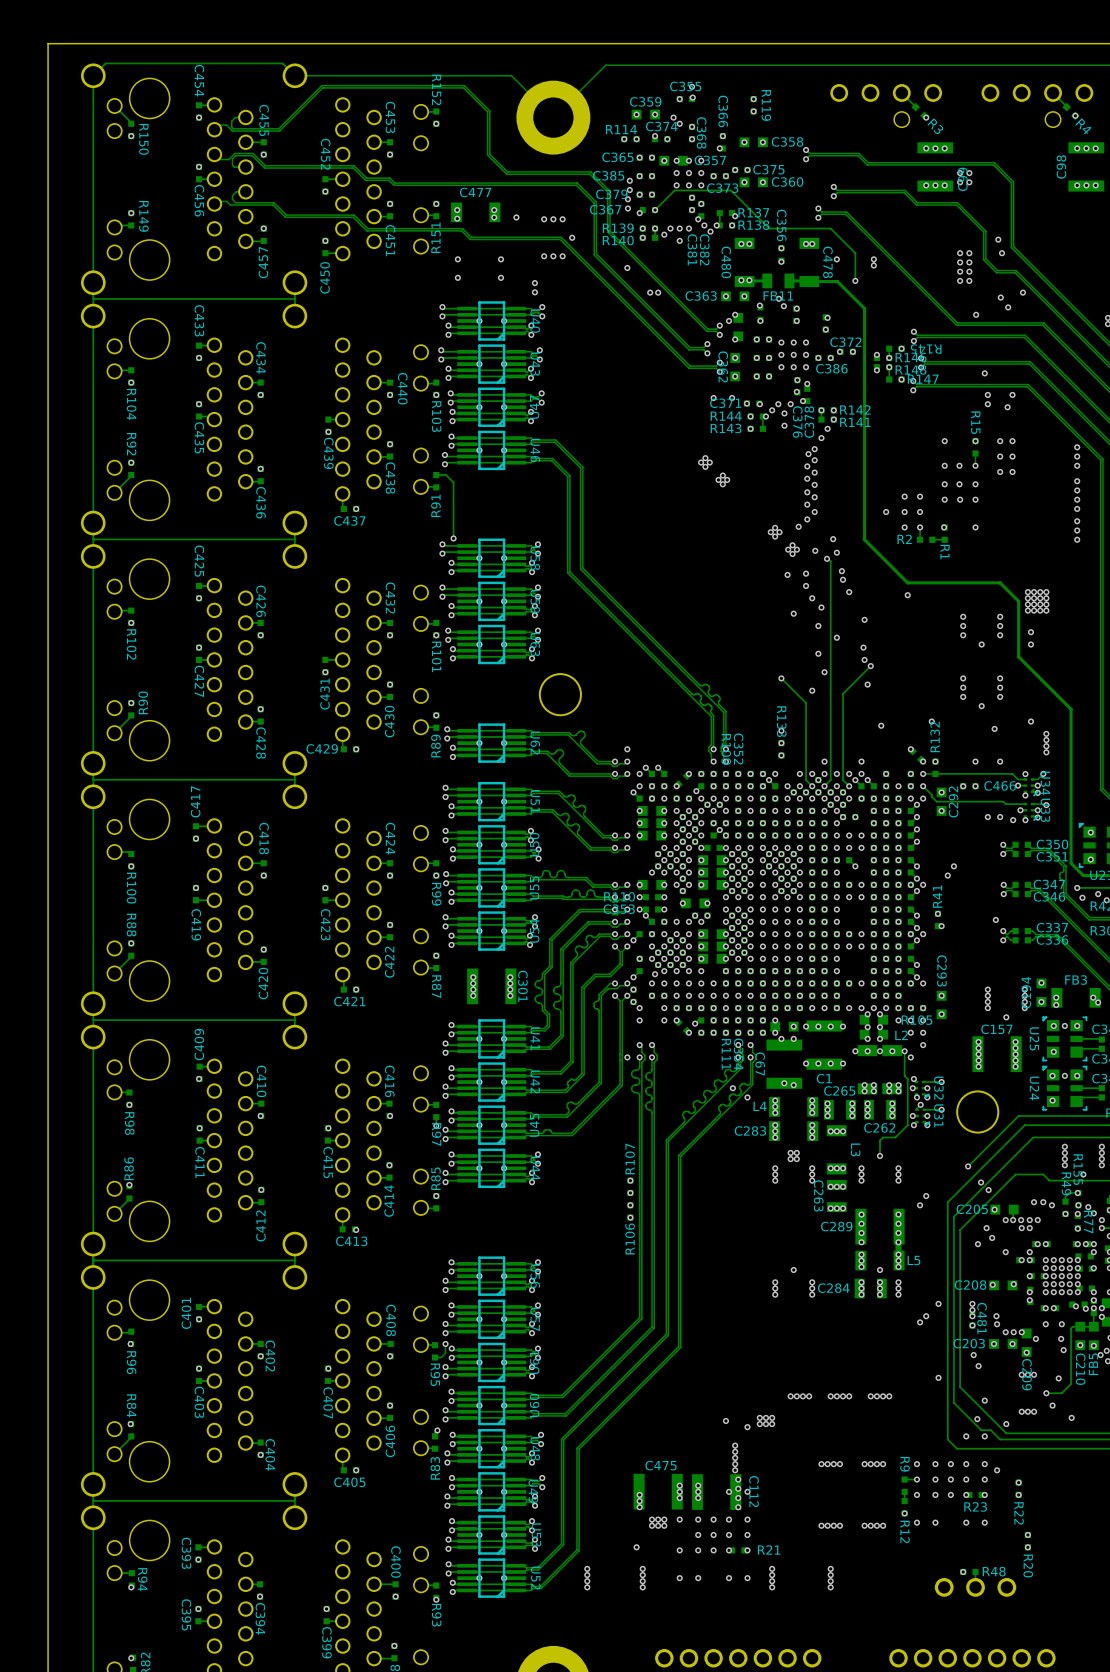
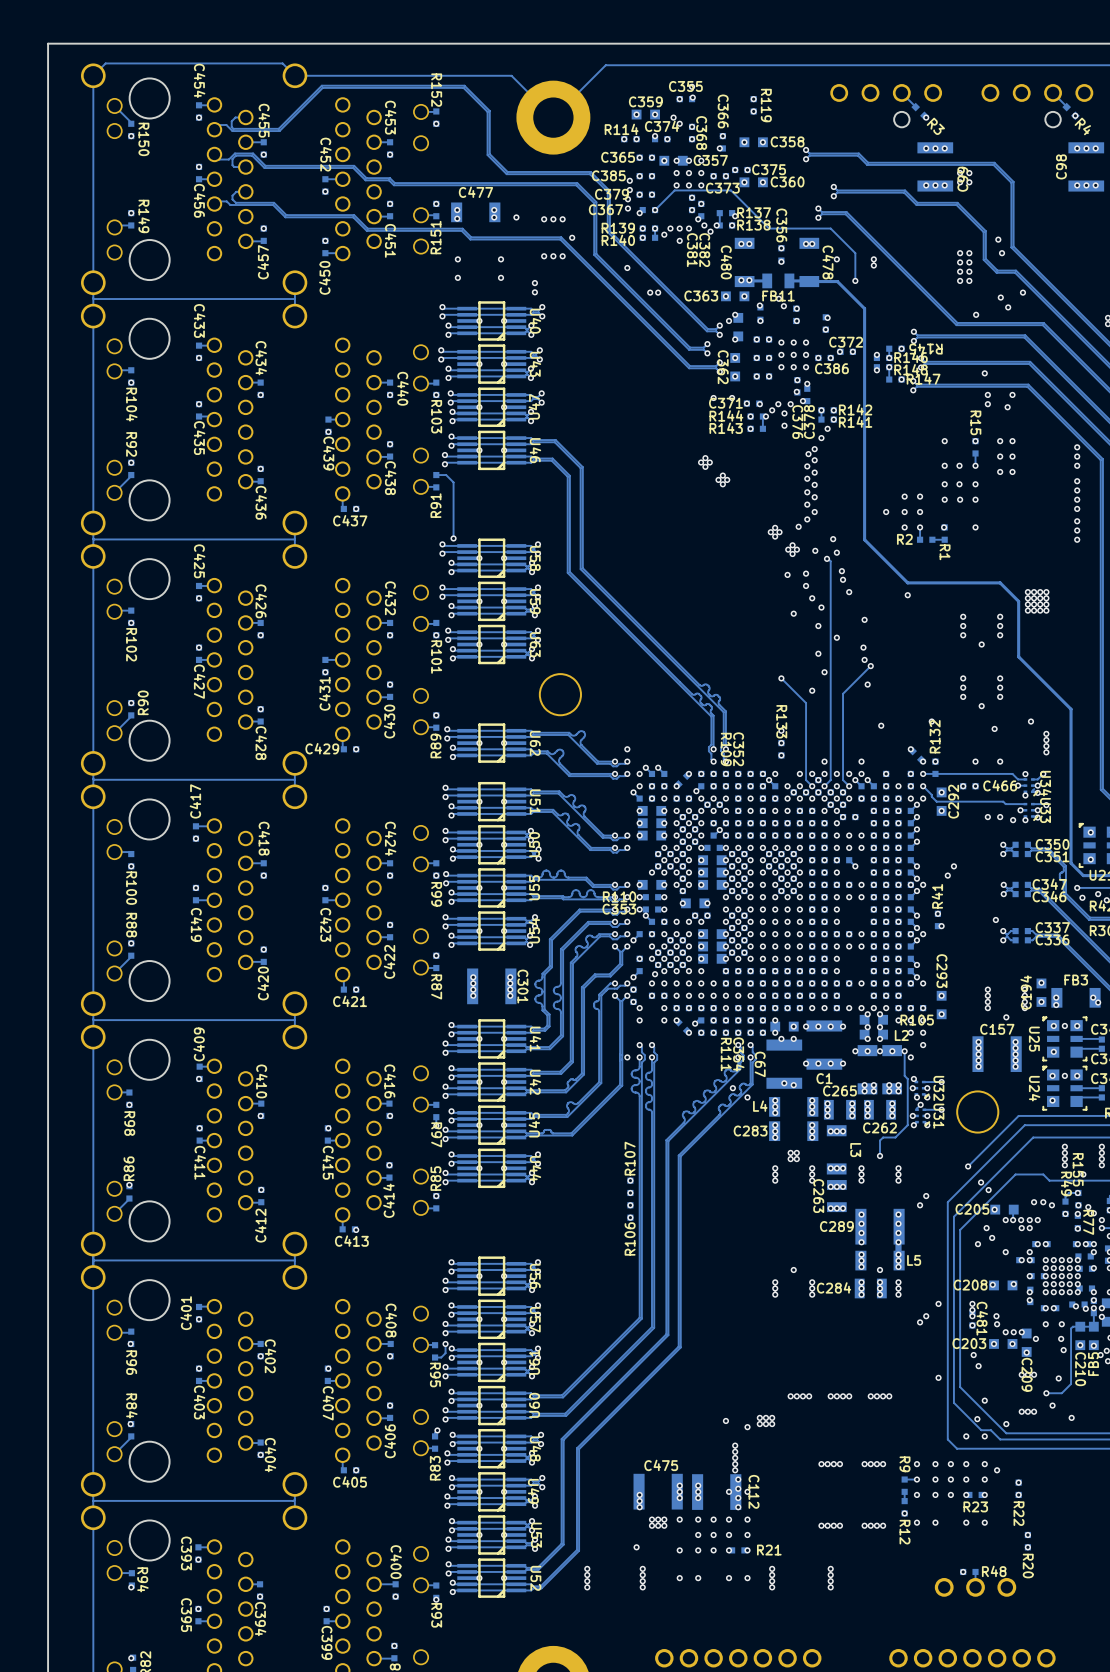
via: (1030, 632) -> none
via: (1030, 644) -> none

